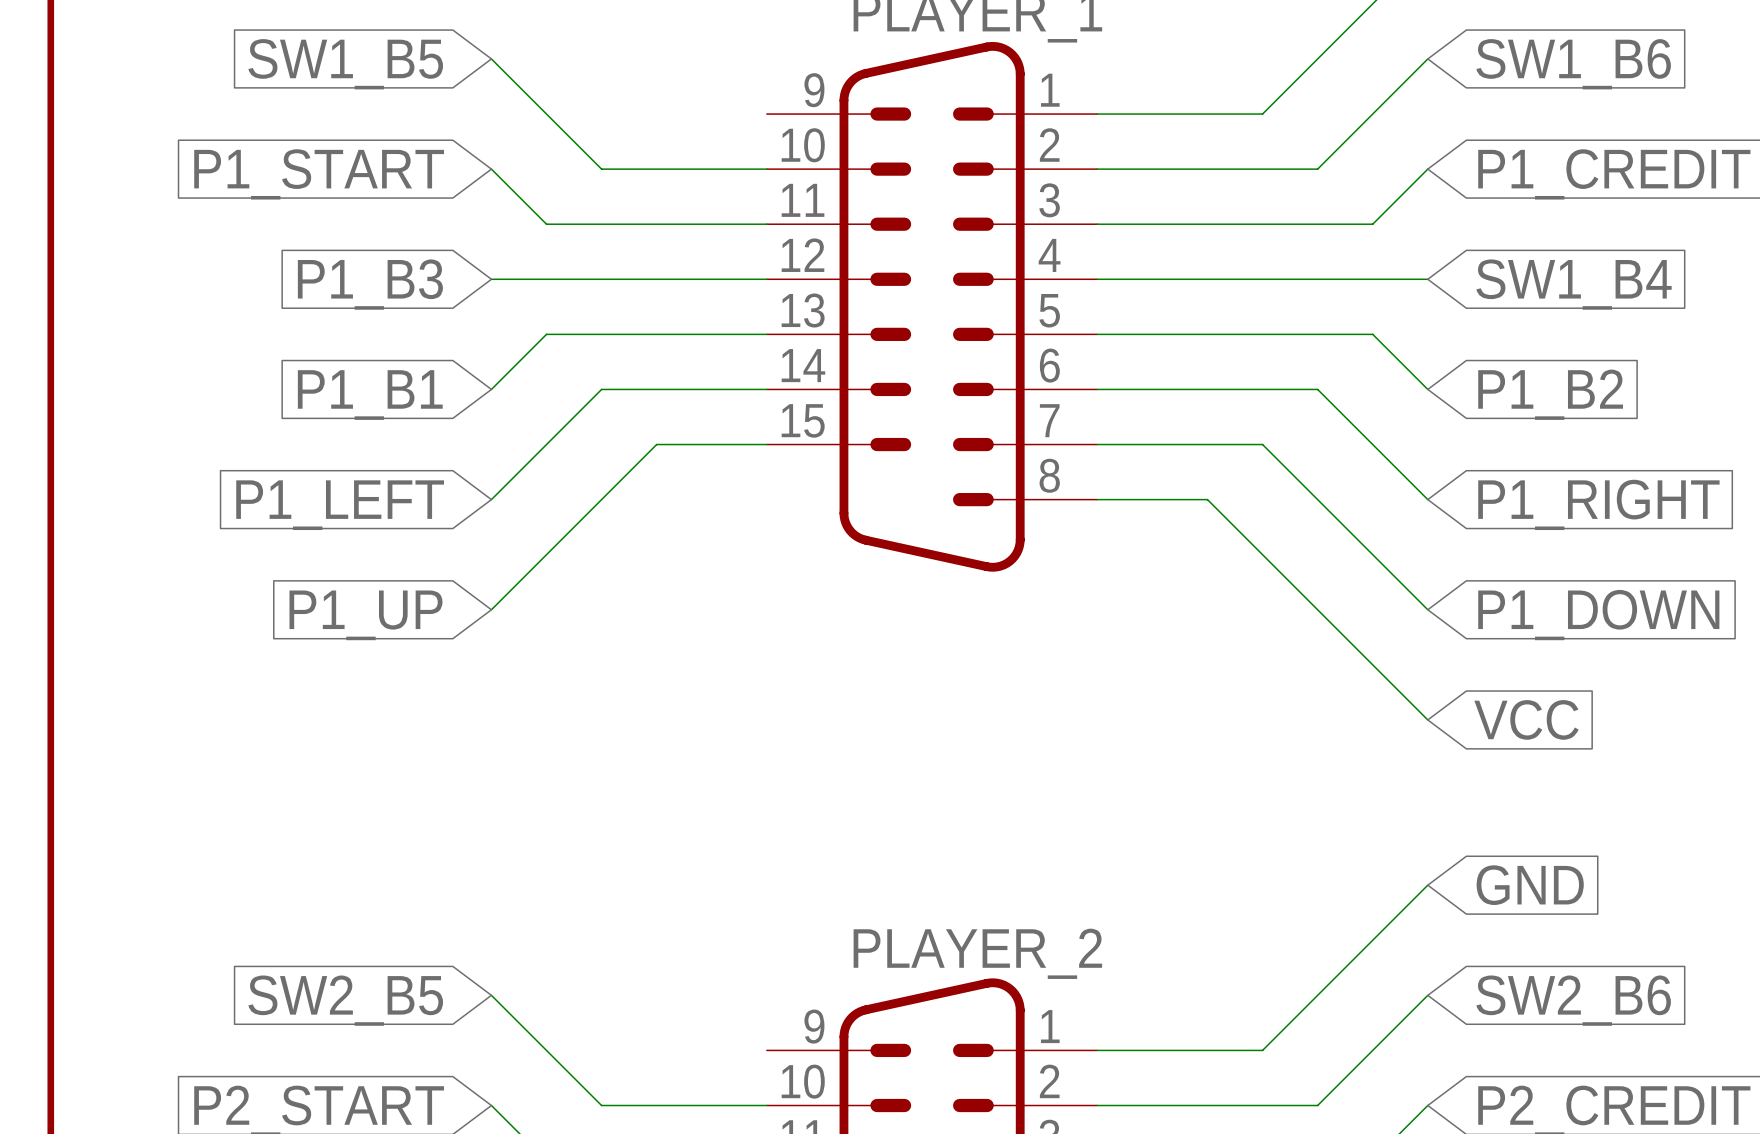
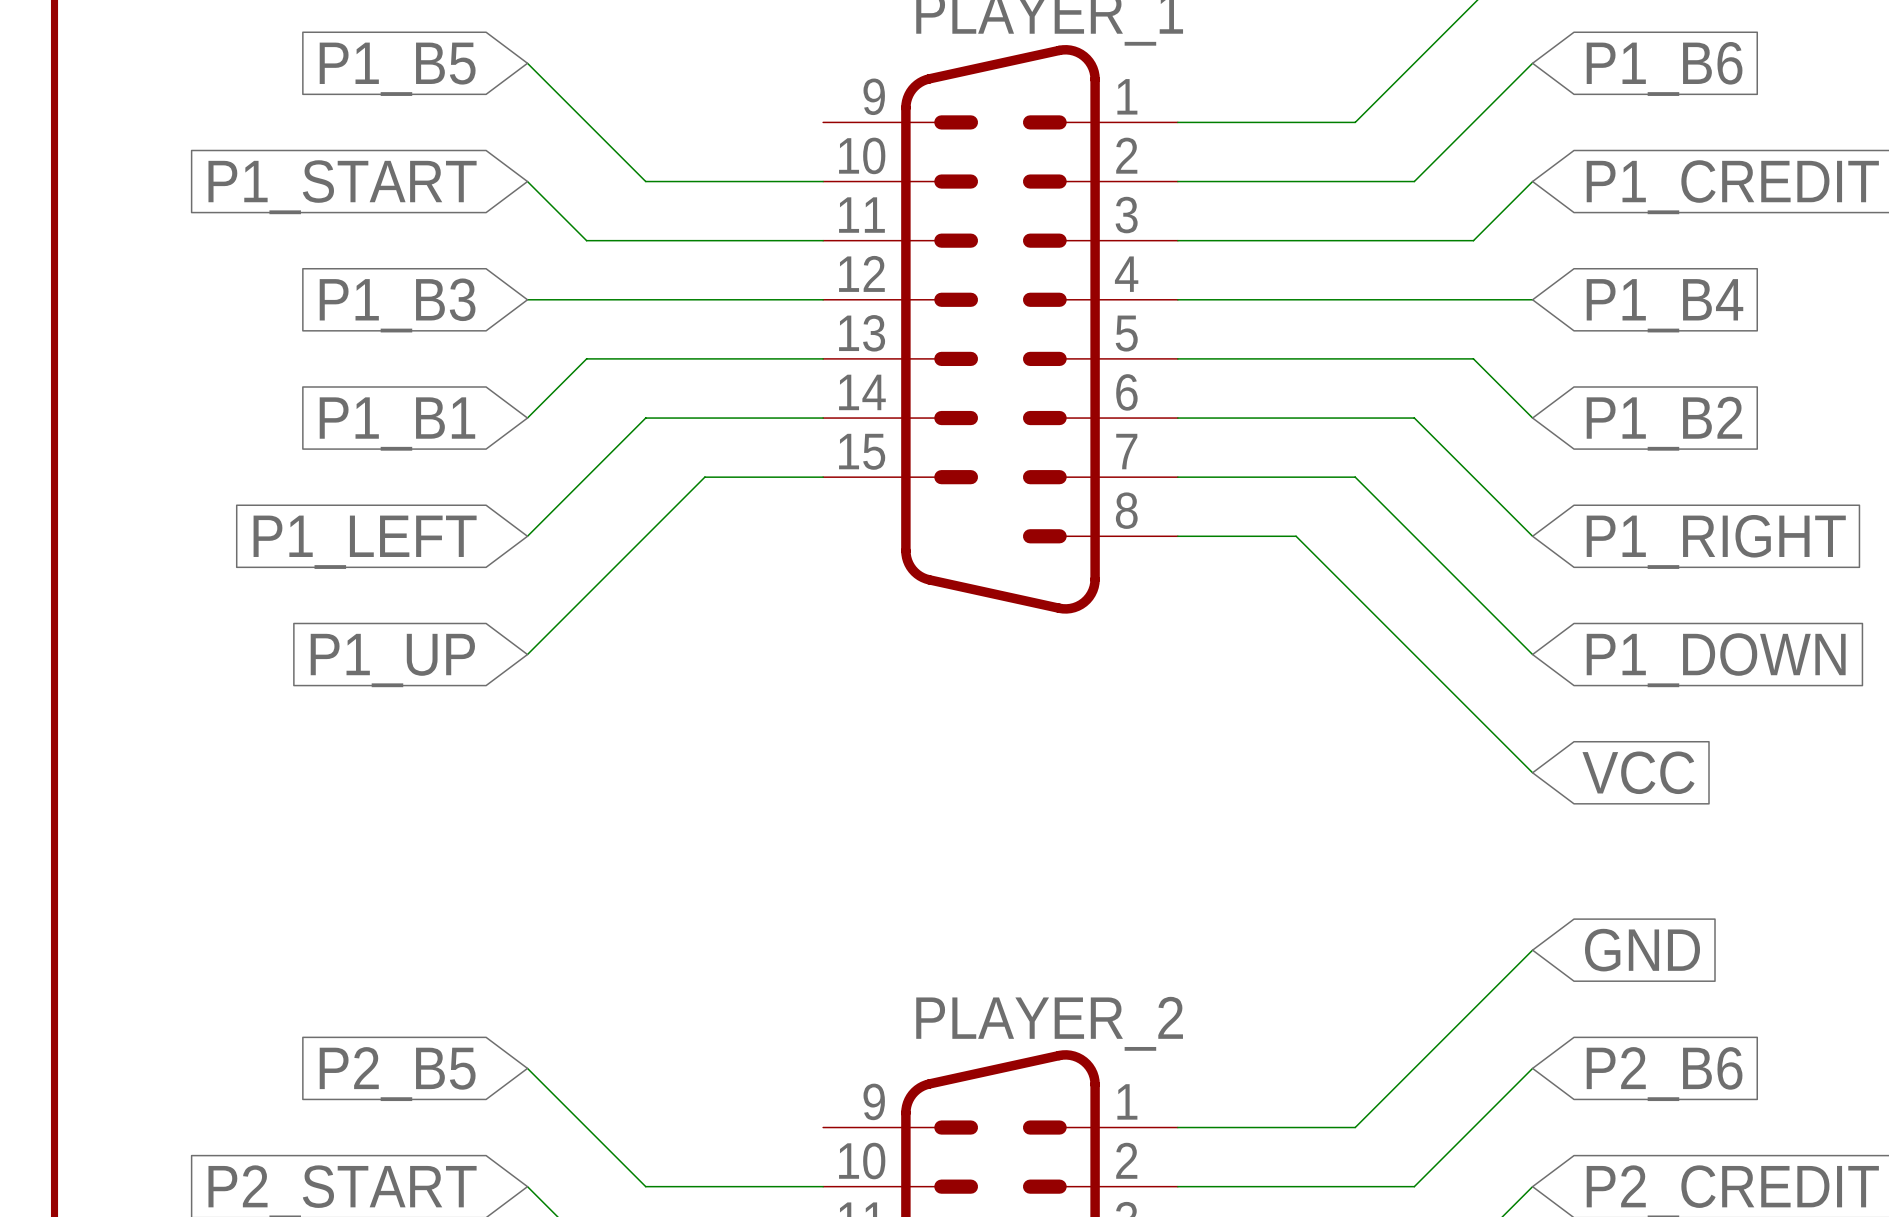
global label: SW1_B5 (345, 64) -> P1_B5 (397, 69)
global label: SW1_B6 (1573, 64) -> P1_B6 (1664, 68)
global label: SW1_B4 (1574, 284) -> P1_B4 (1664, 305)
global label: SW2_B5 (345, 1000) -> P2_B5 (397, 1074)
global label: SW2_B6 (1573, 1000) -> P2_B6 (1664, 1074)

